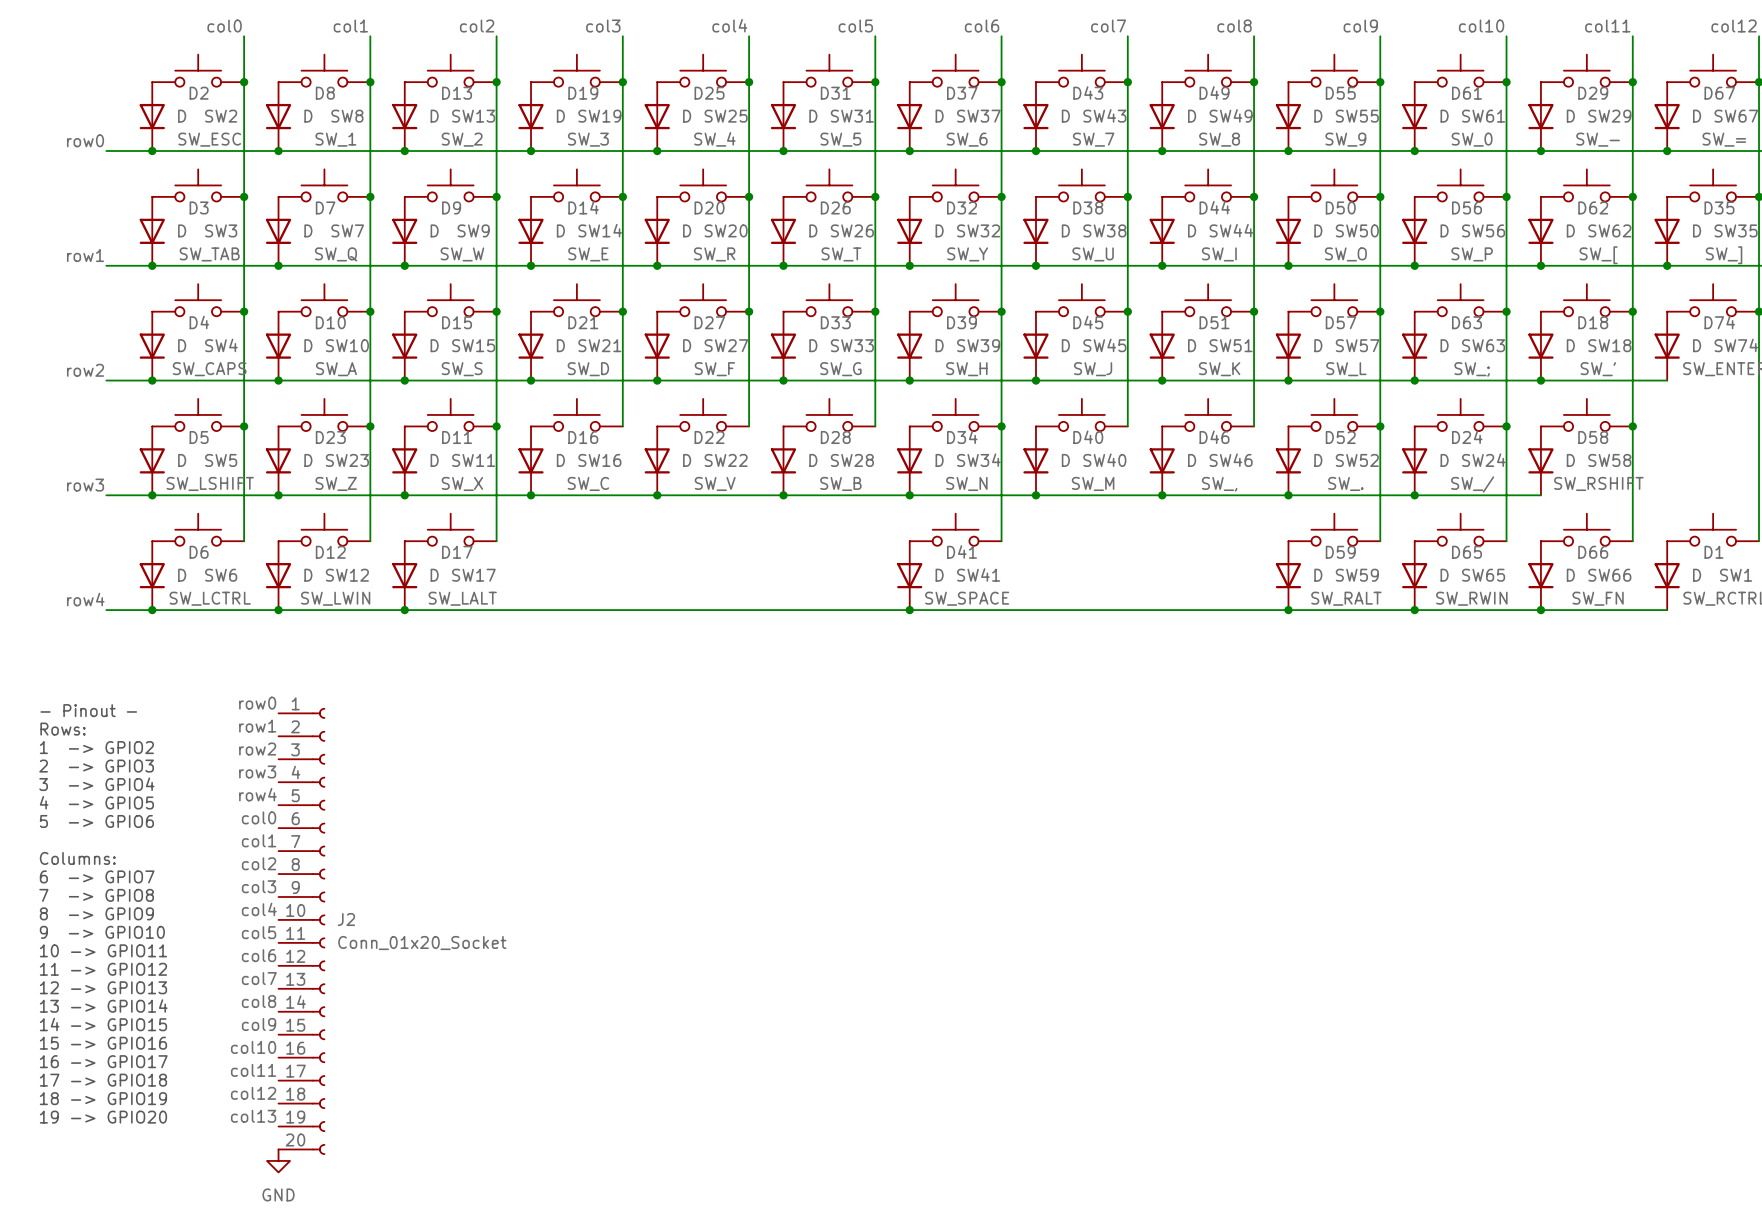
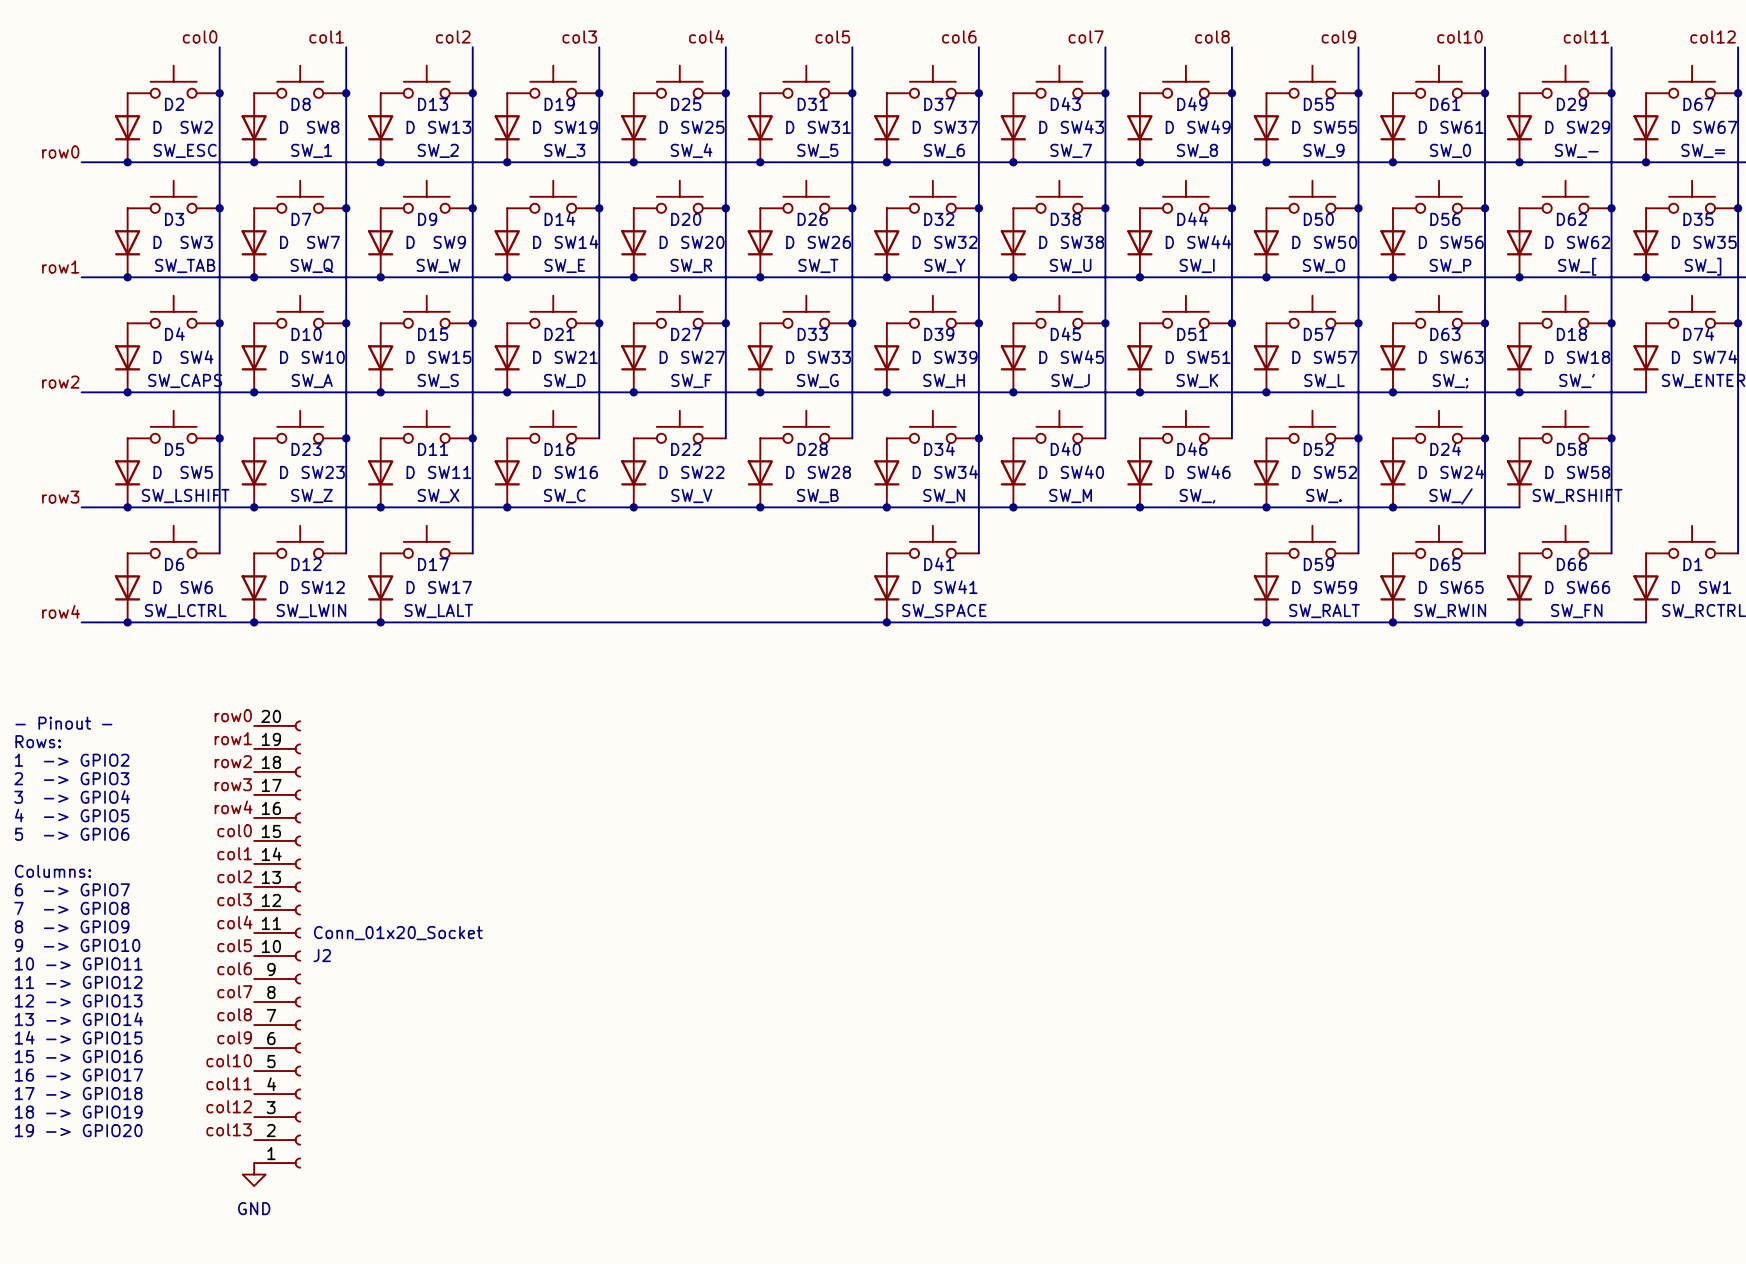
J2 flip: as is (318, 931) -> up-down (294, 944)

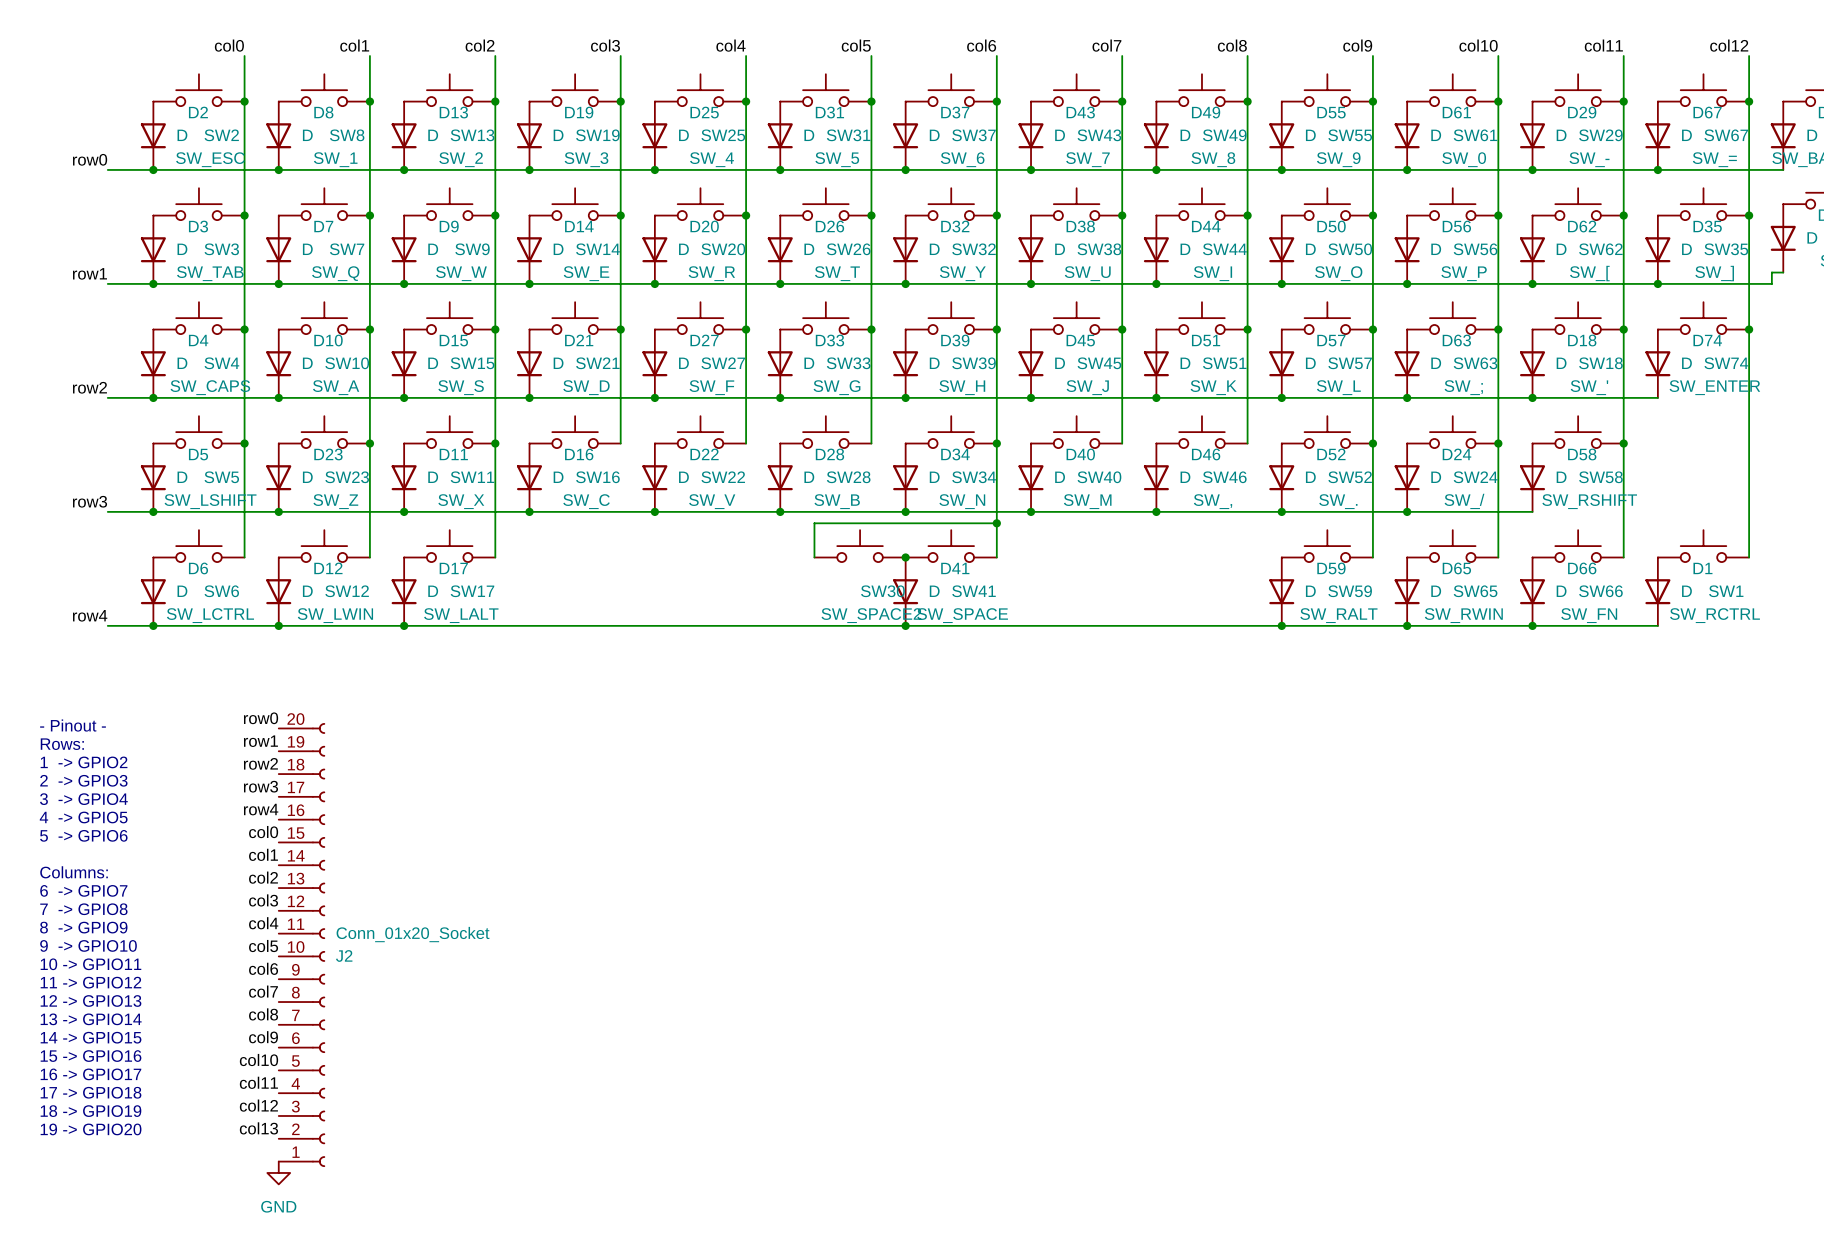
wire: none -> (996, 523) (814, 523) (814, 557)
junction: none -> (996, 523)
SW30: none -> SW_SPACE2 (860, 546)
junction: none -> (905, 557)

